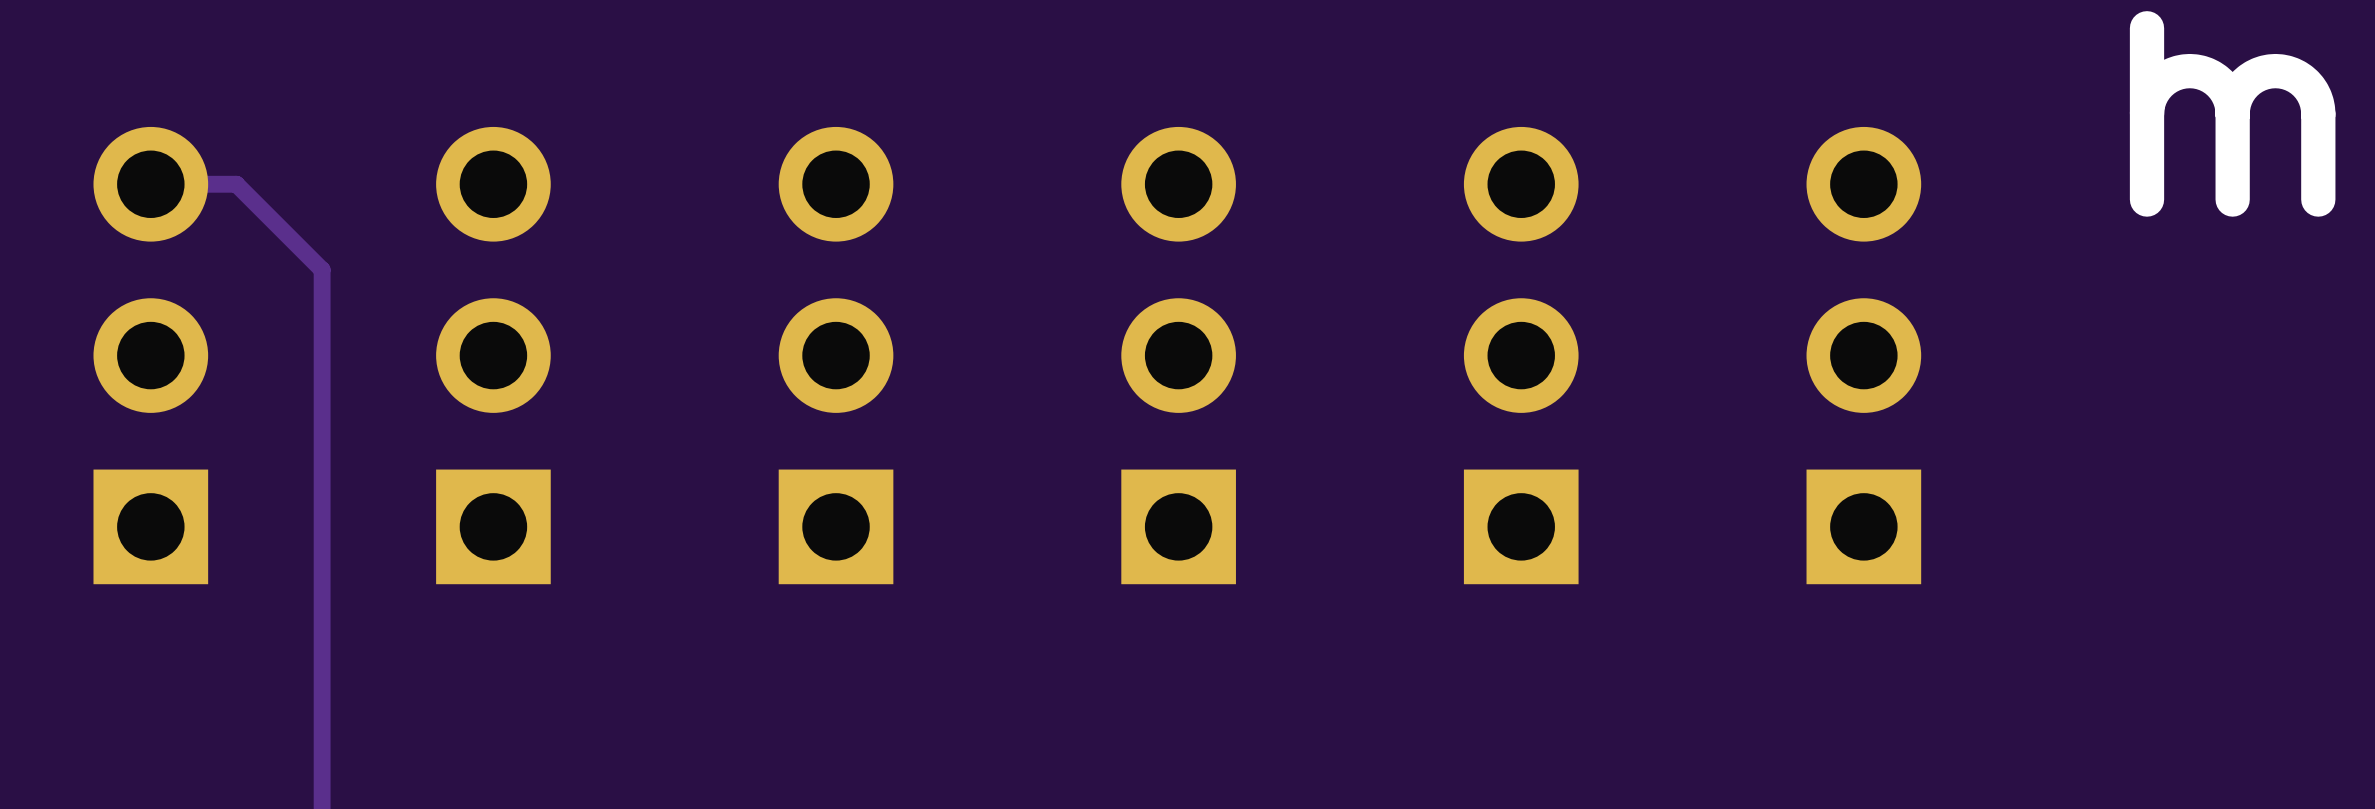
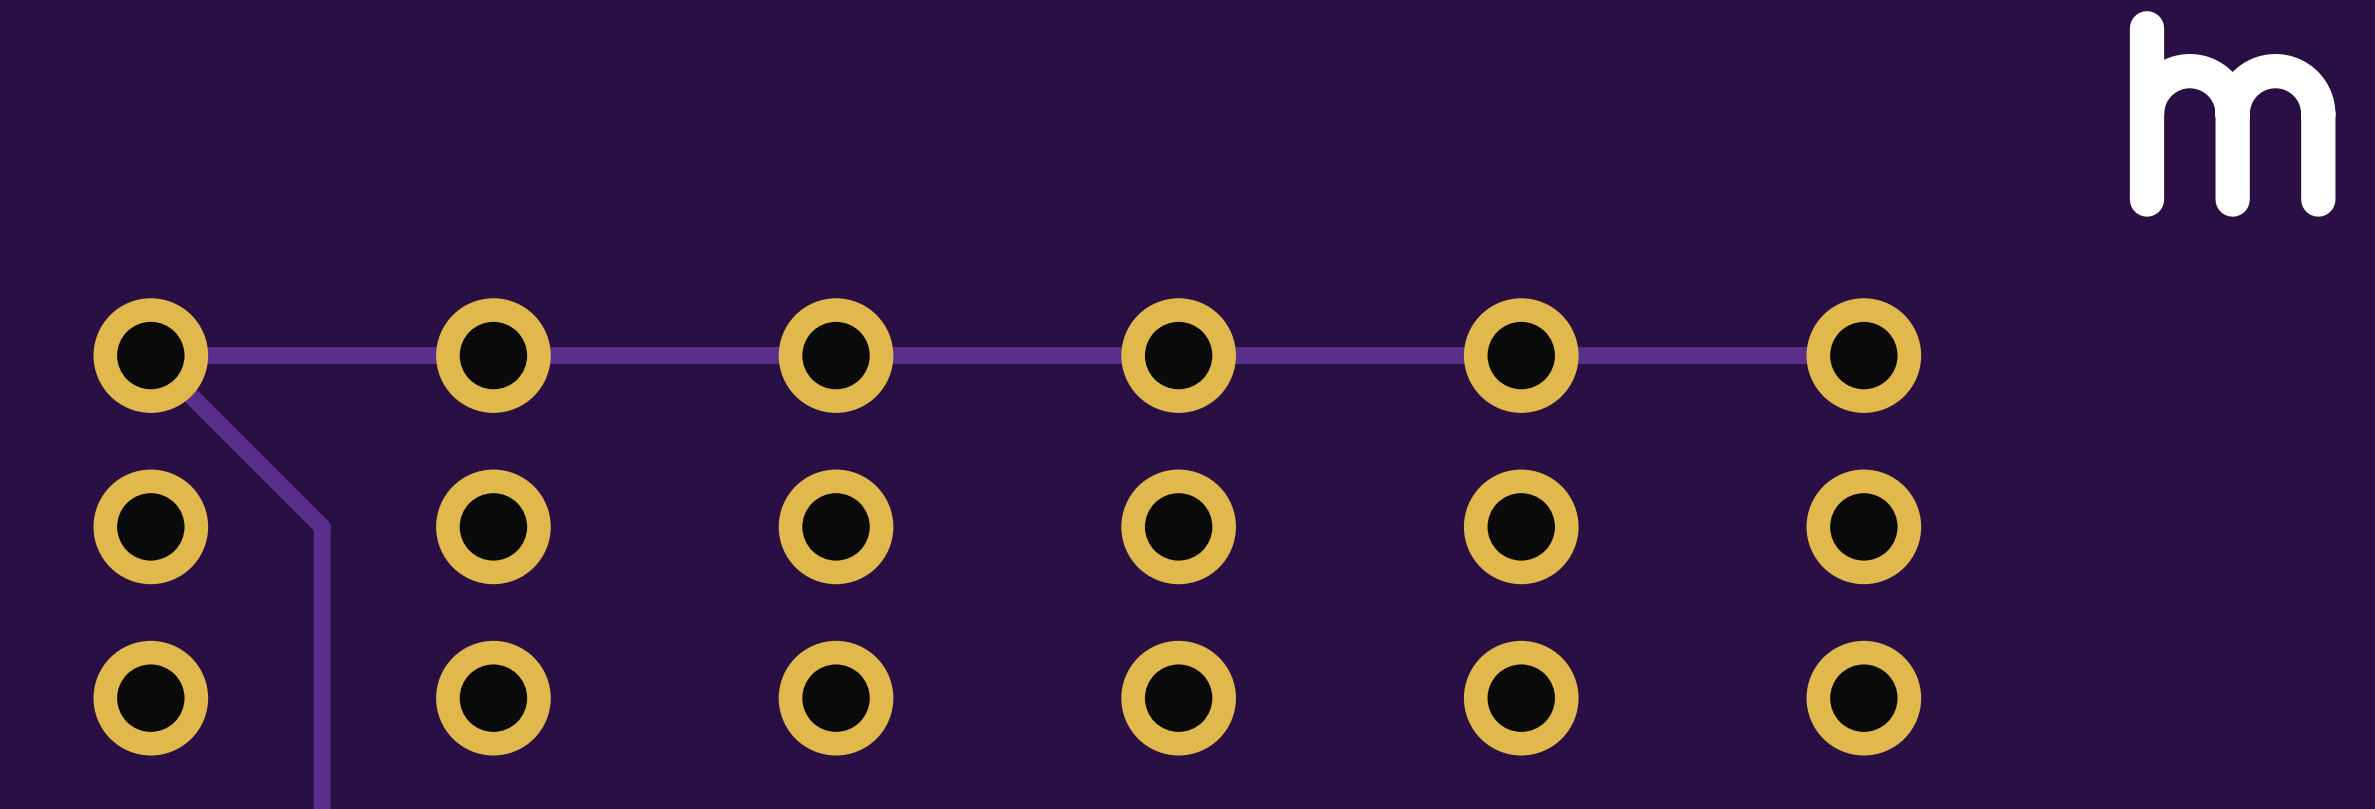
track: (150, 184) (236, 184) (322, 269) (322, 526) -> (1863, 355) (150, 355) (322, 526)
part: (150, 355) -> none
part: (493, 355) -> none
part: (836, 355) -> none
part: (1178, 355) -> none
part: (1521, 355) -> none
part: (1863, 355) -> none
part: none -> (150, 526)
part: none -> (493, 526)
part: none -> (836, 526)
part: none -> (1178, 526)
part: none -> (1521, 526)
part: none -> (1863, 526)

